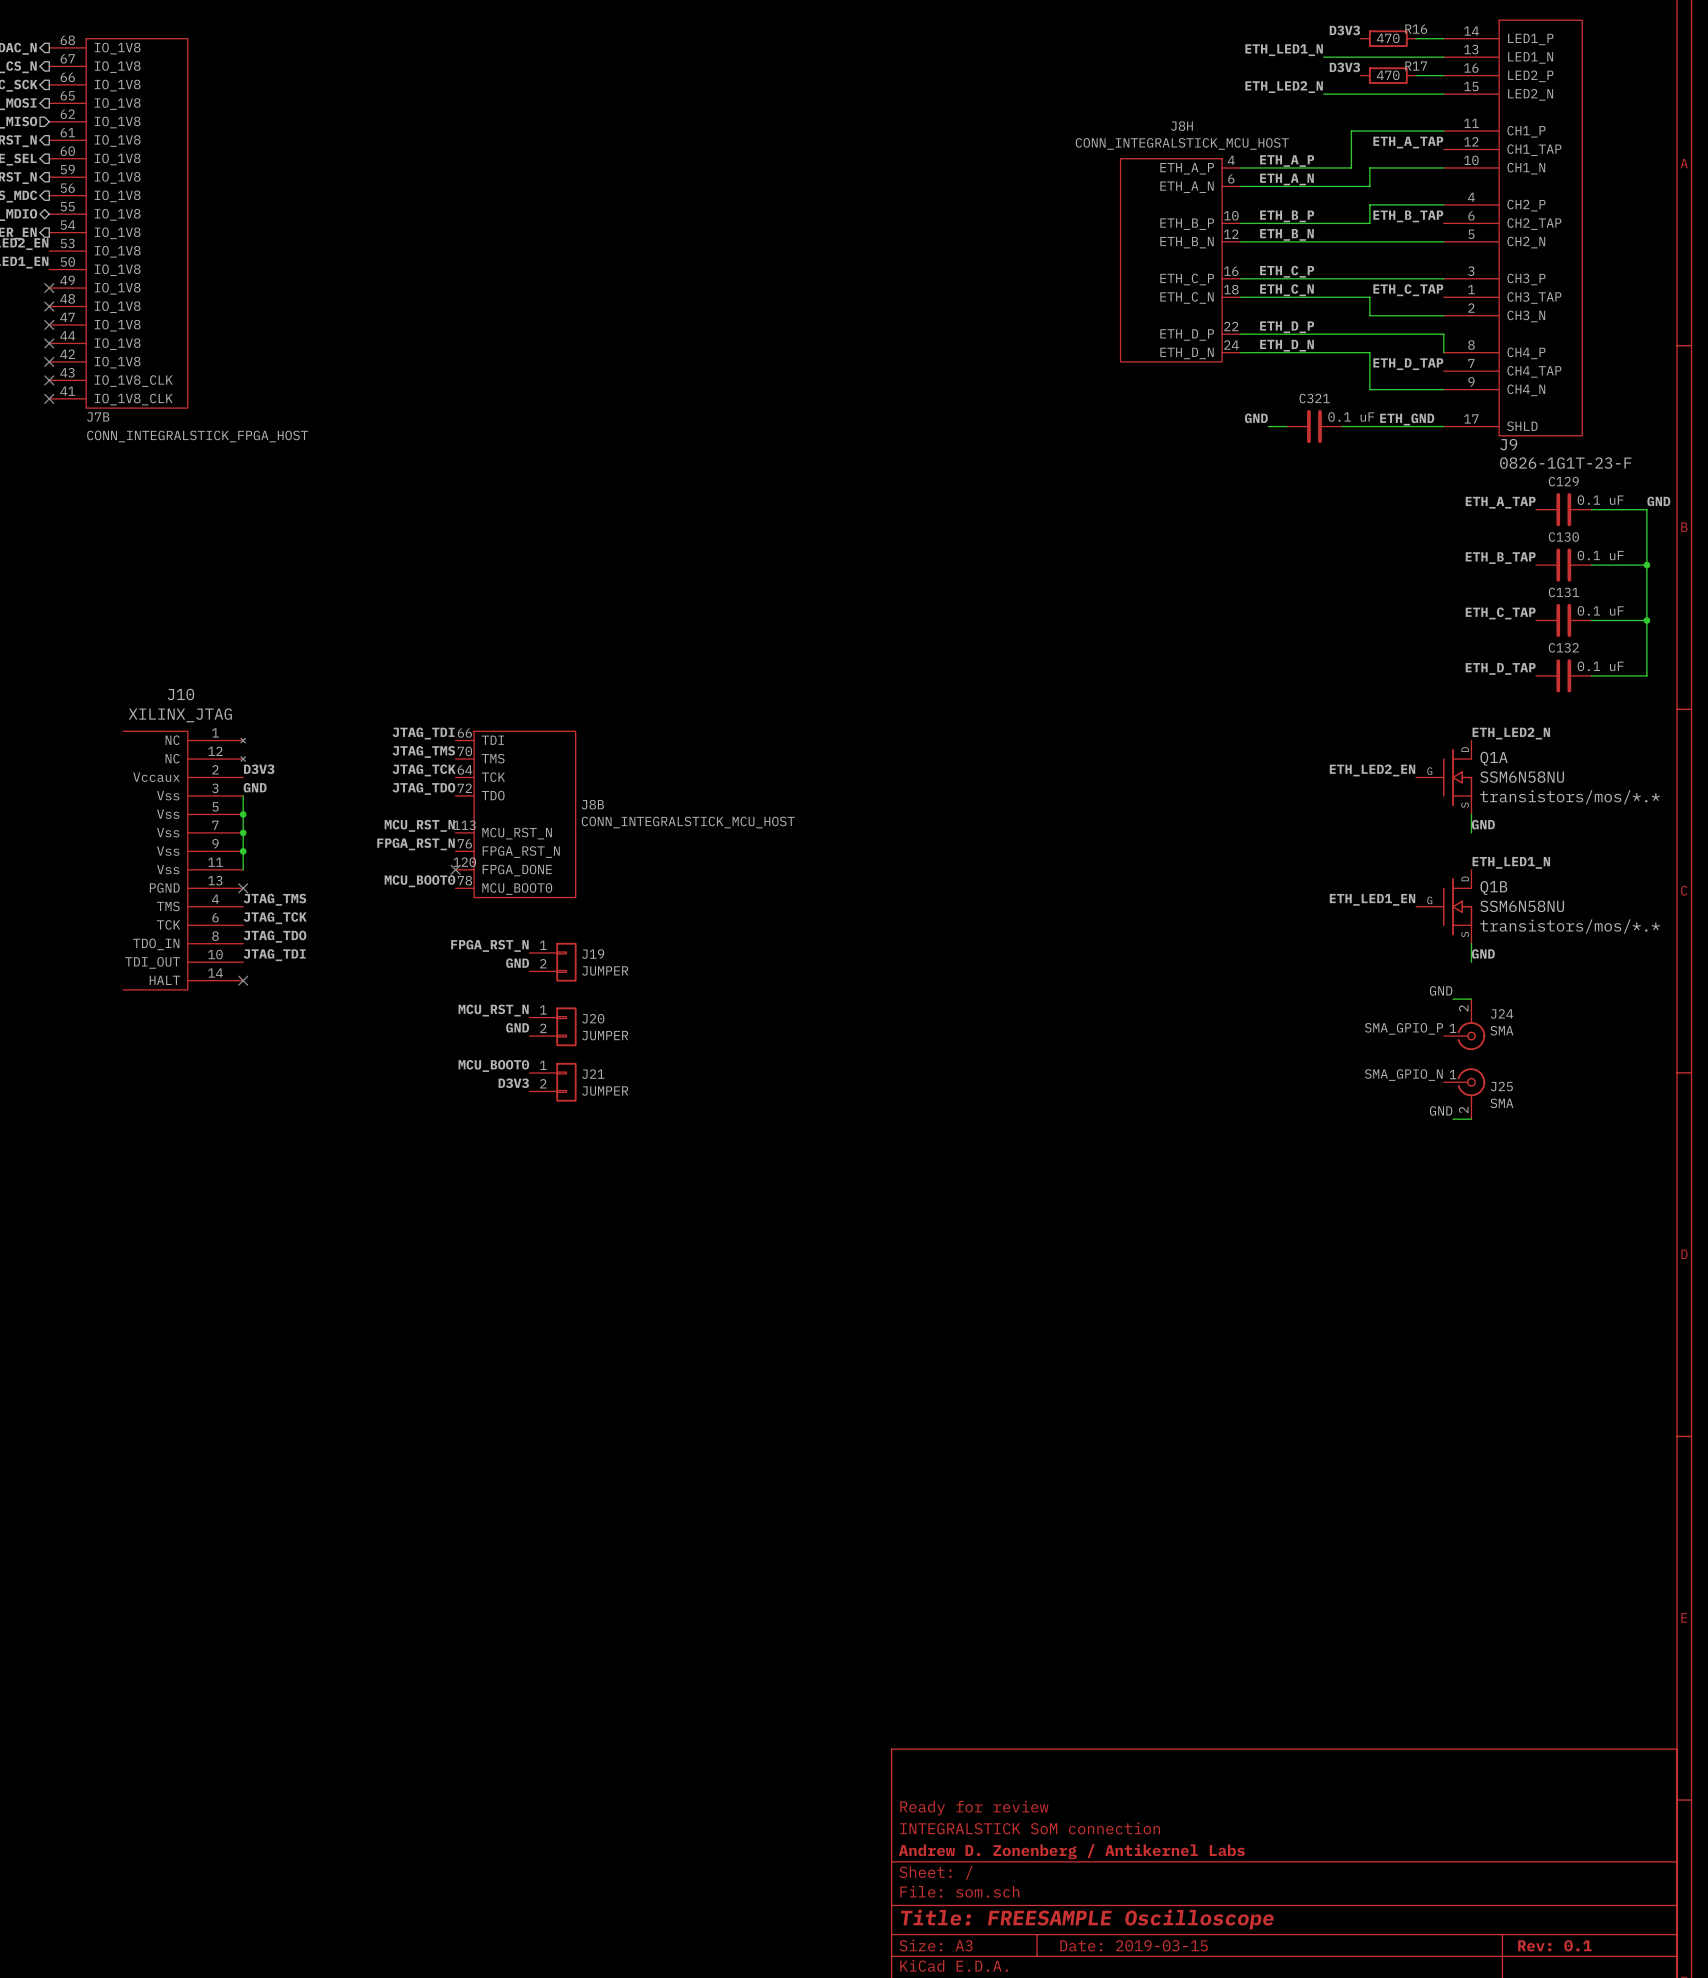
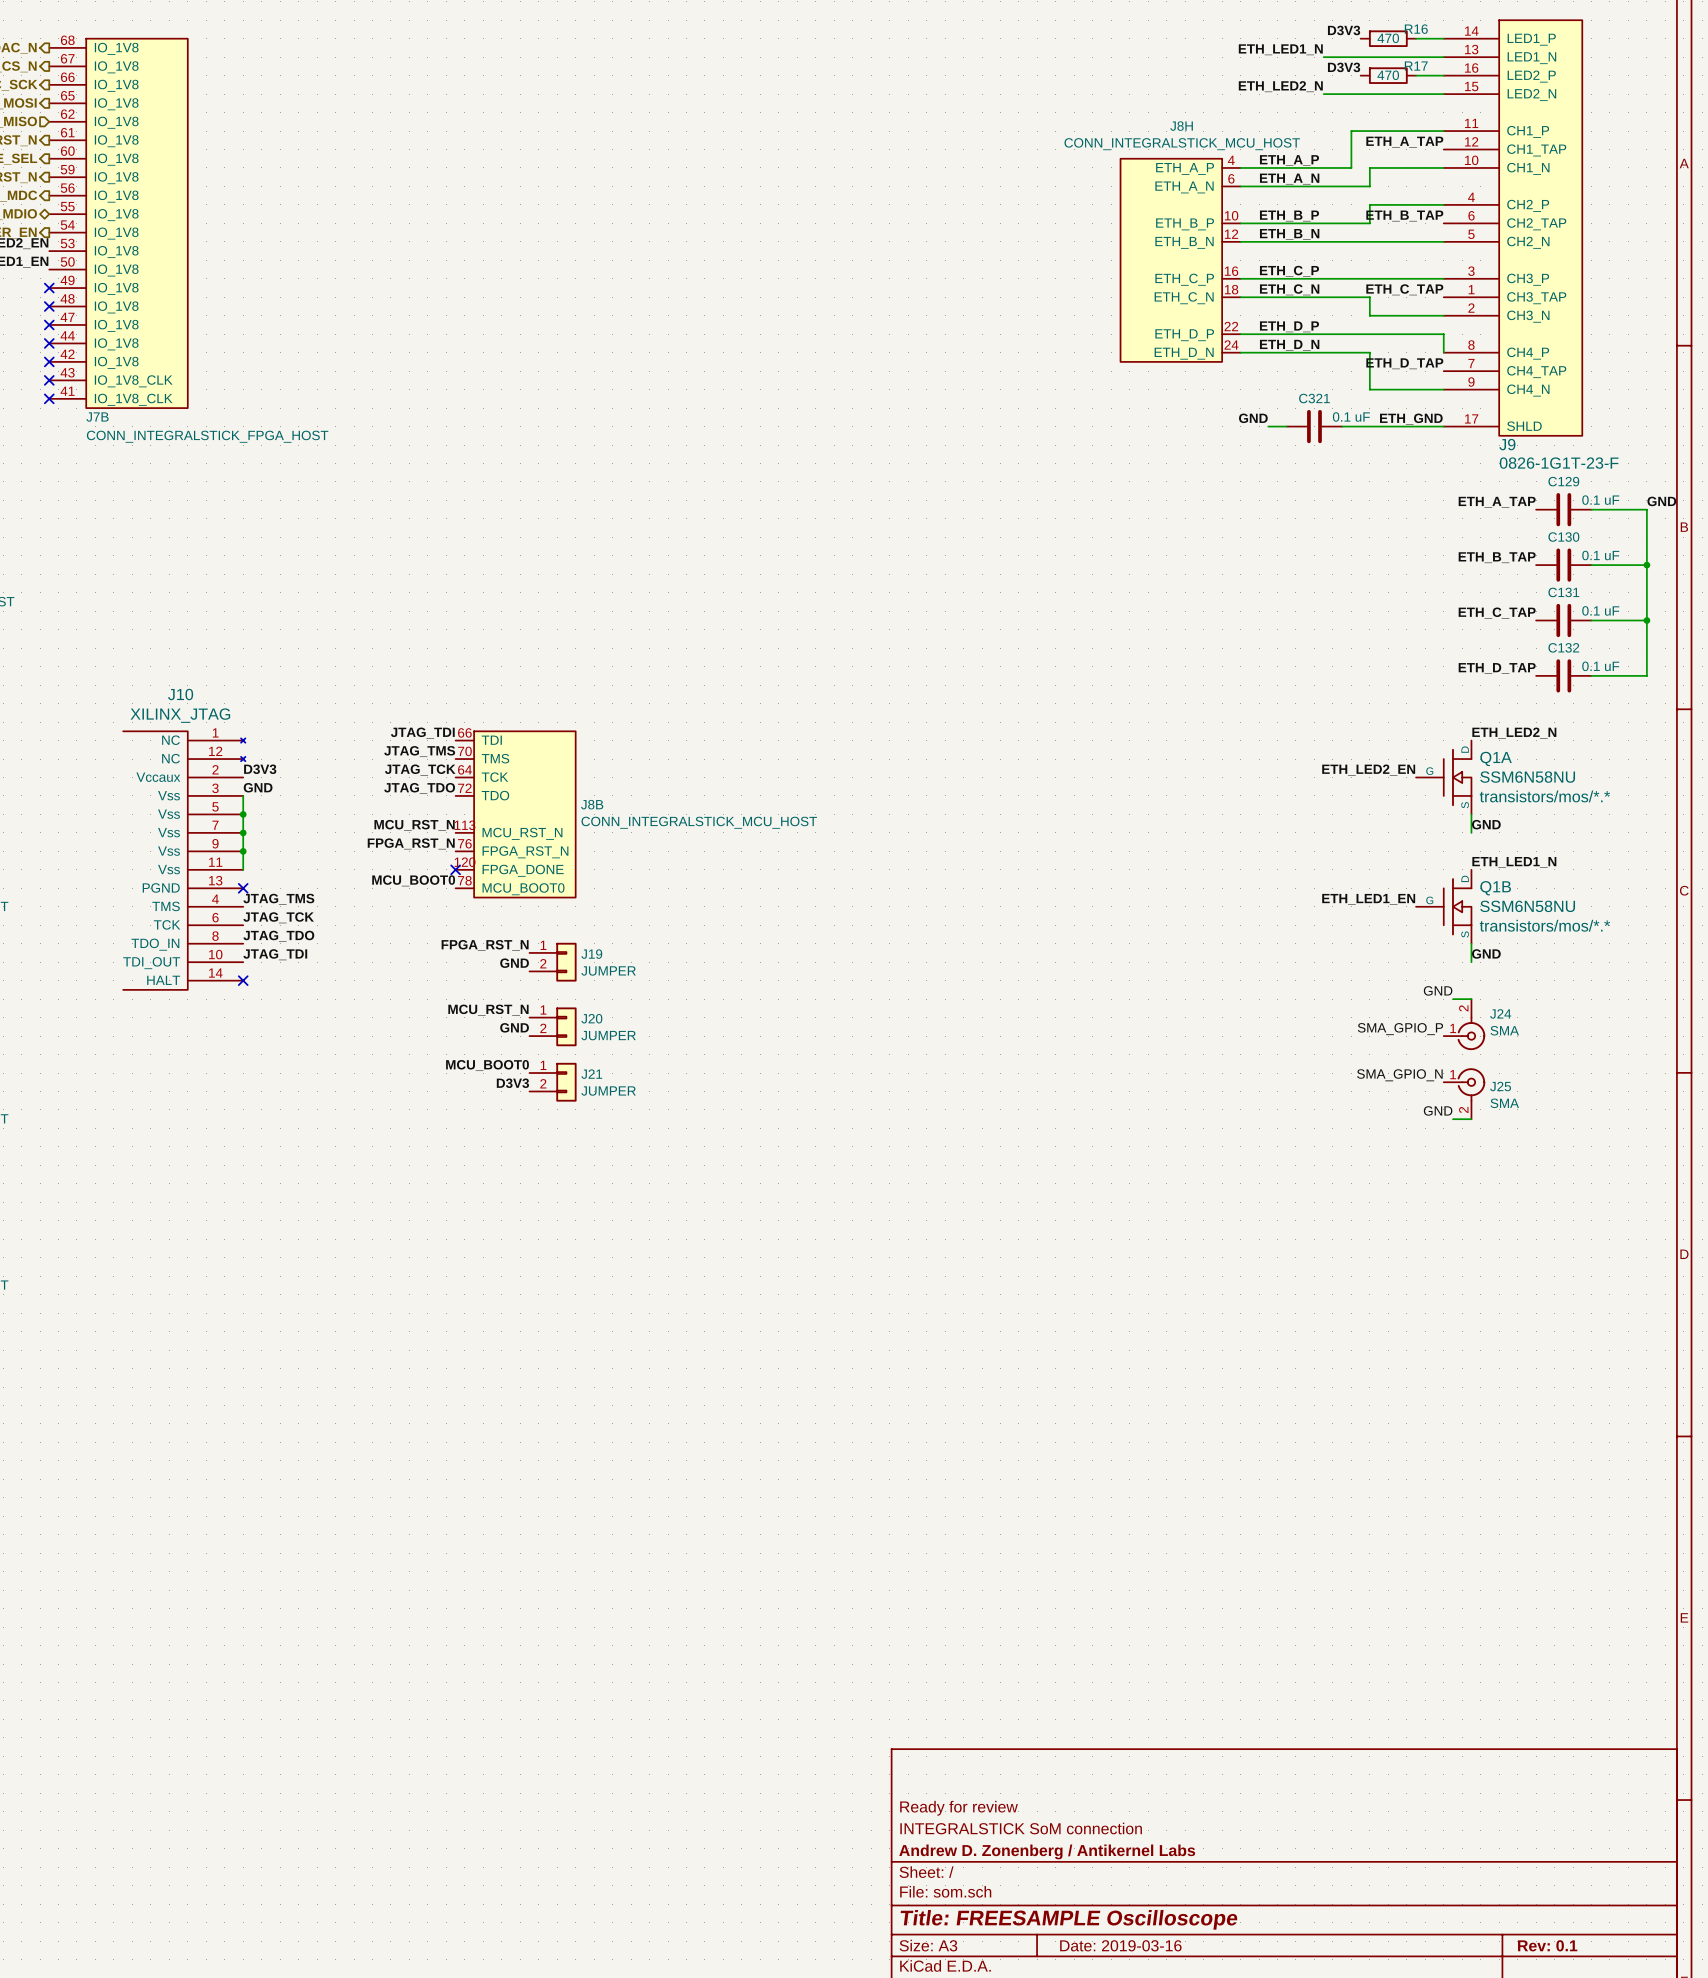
title block: Date: 2019-03-15 (1134, 1945) -> Date: 2019-03-16 (1120, 1945)

